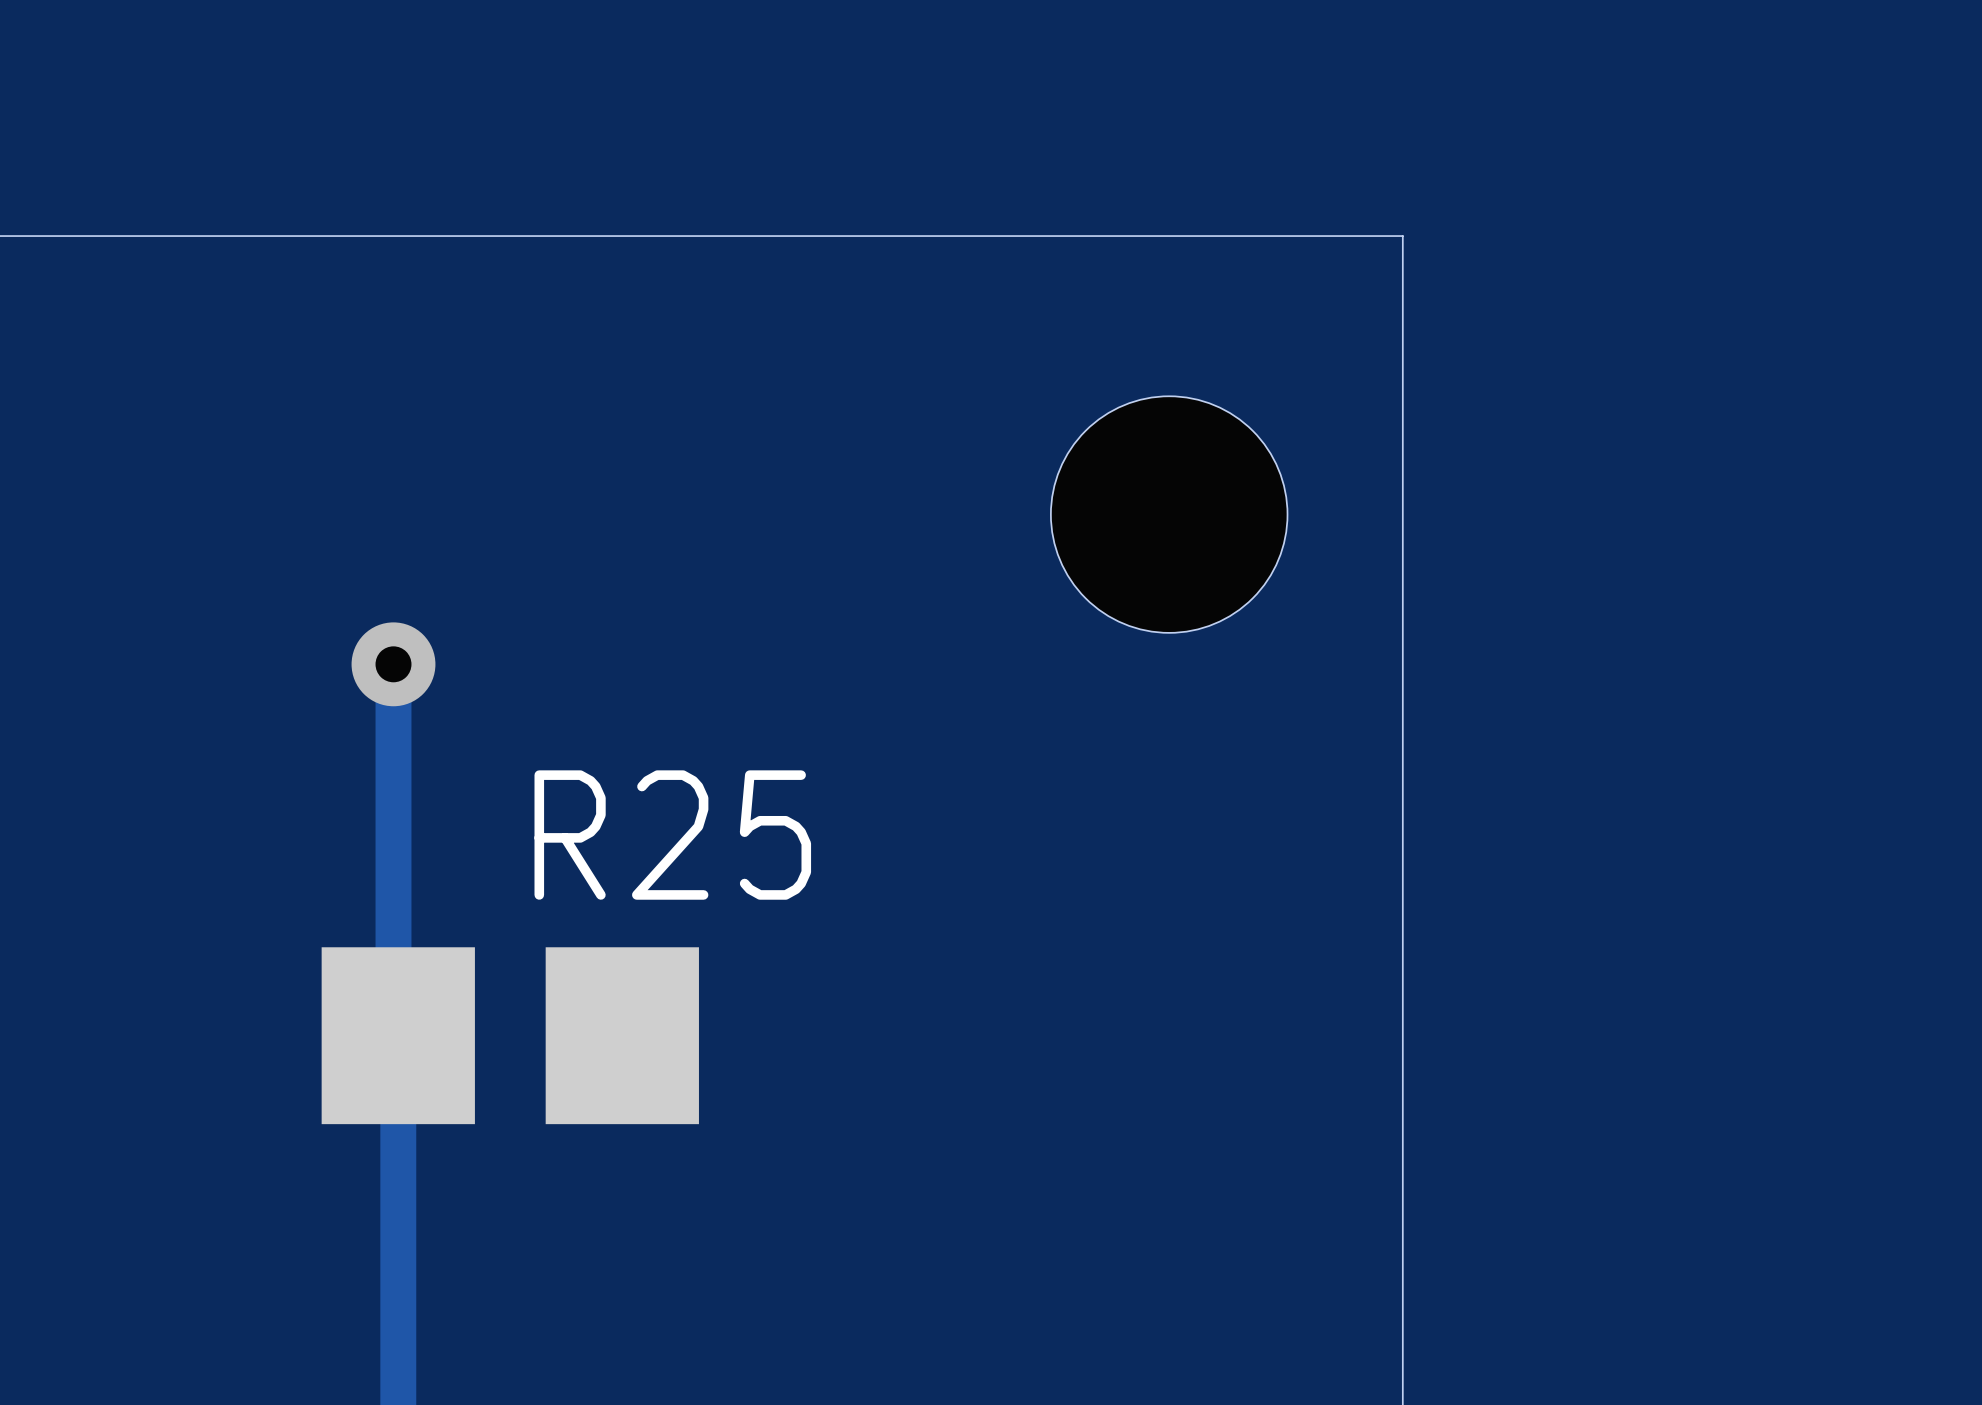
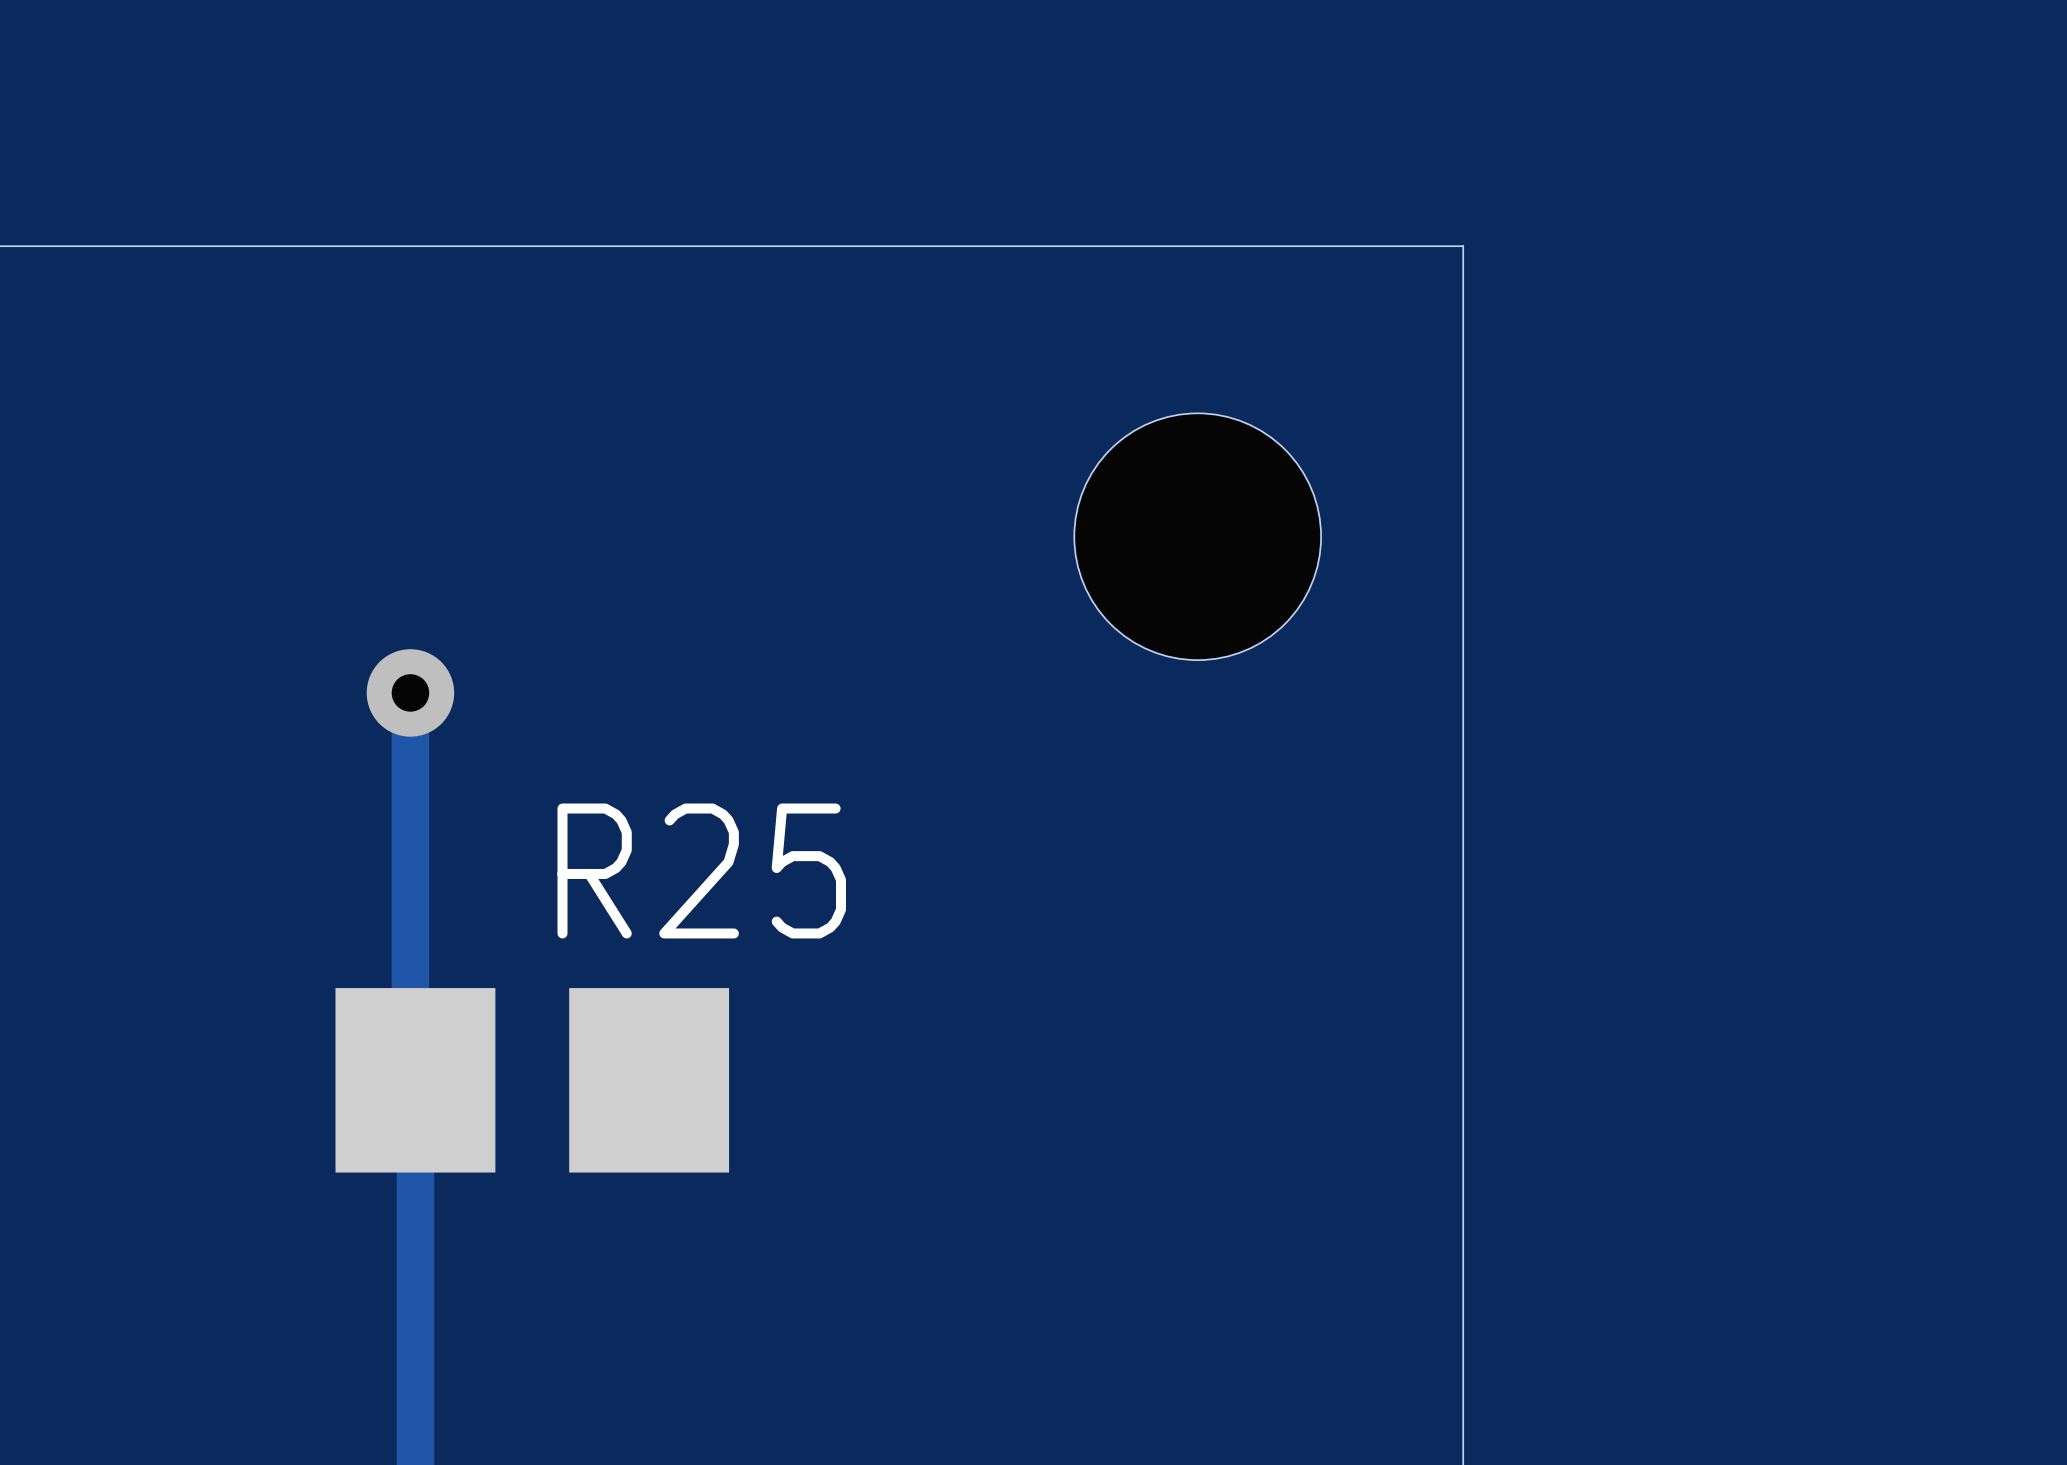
hole position: (1169, 514) -> (1197, 536)

